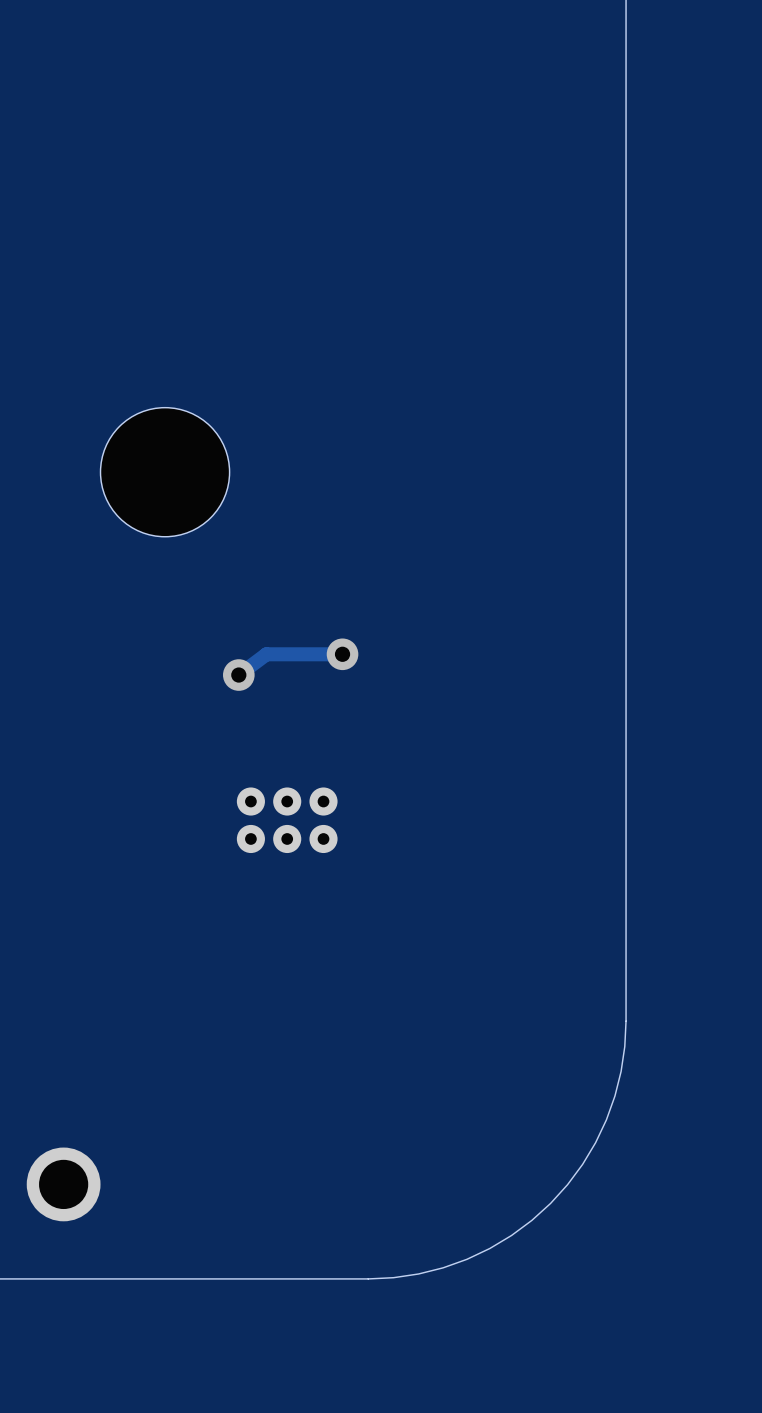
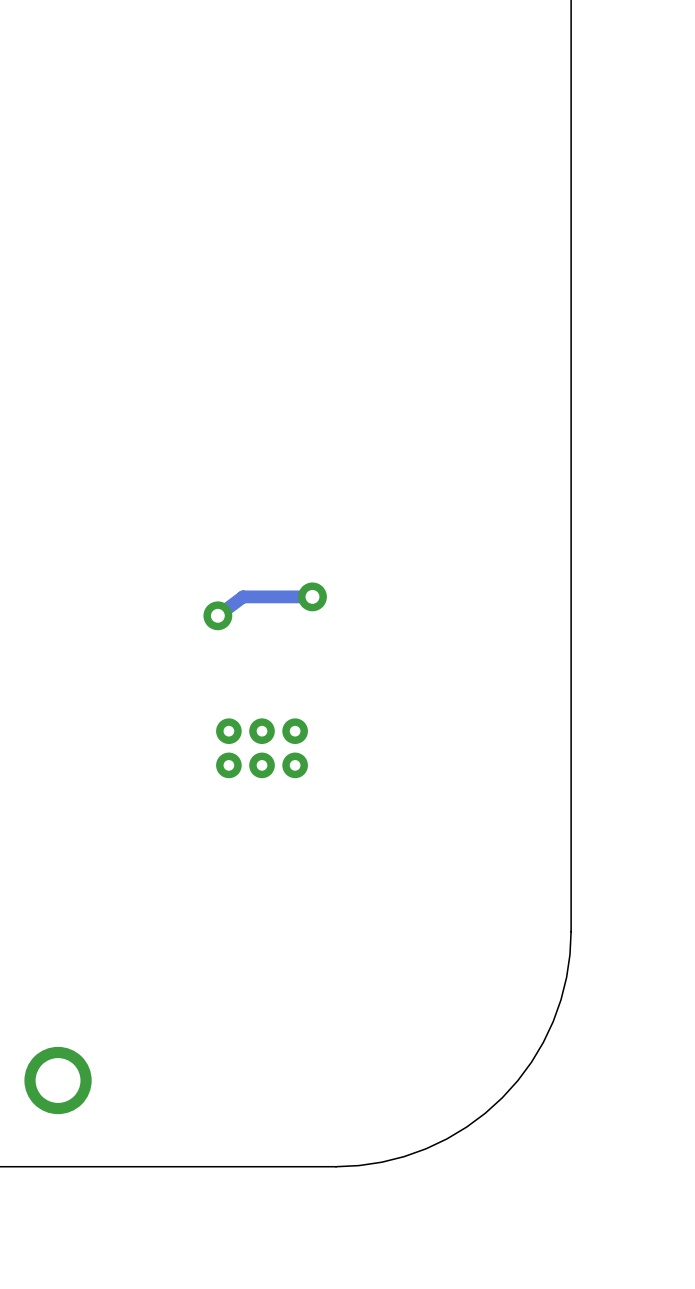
hole: (165, 472) -> none

